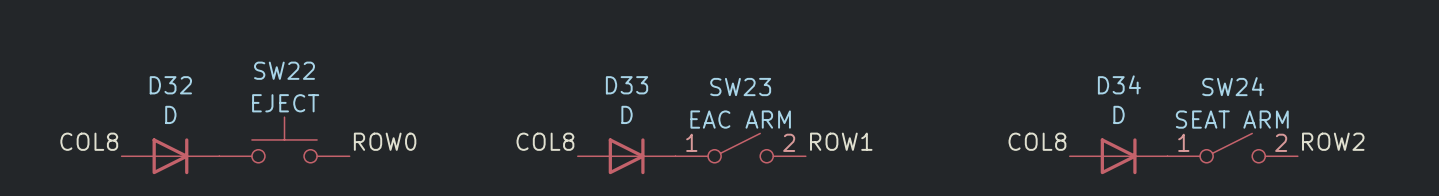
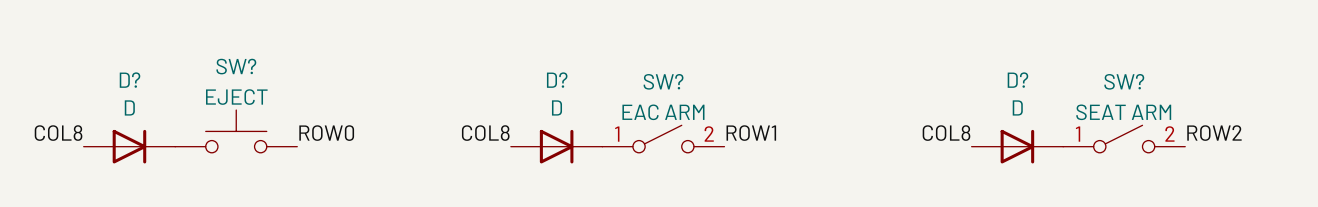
SW22 name: SW22 (284, 70) -> SW? (236, 66)
D34 name: D34 (1119, 84) -> D? (1017, 80)
D32 name: D32 (170, 85) -> D? (130, 80)
D33 name: D33 (627, 85) -> D? (557, 80)
SW24 name: SW24 (1233, 86) -> SW? (1124, 81)
SW23 name: SW23 (740, 87) -> SW? (663, 81)

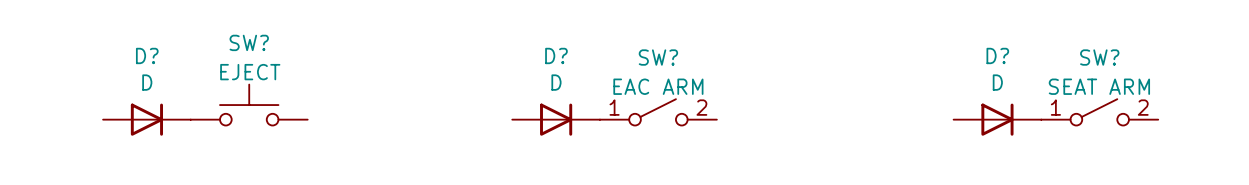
label: COL8 (58, 133) -> none
label: ROW0 (326, 133) -> none
label: COL8 (485, 133) -> none
label: ROW1 (751, 133) -> none
label: COL8 (946, 133) -> none
label: ROW2 (1214, 133) -> none

